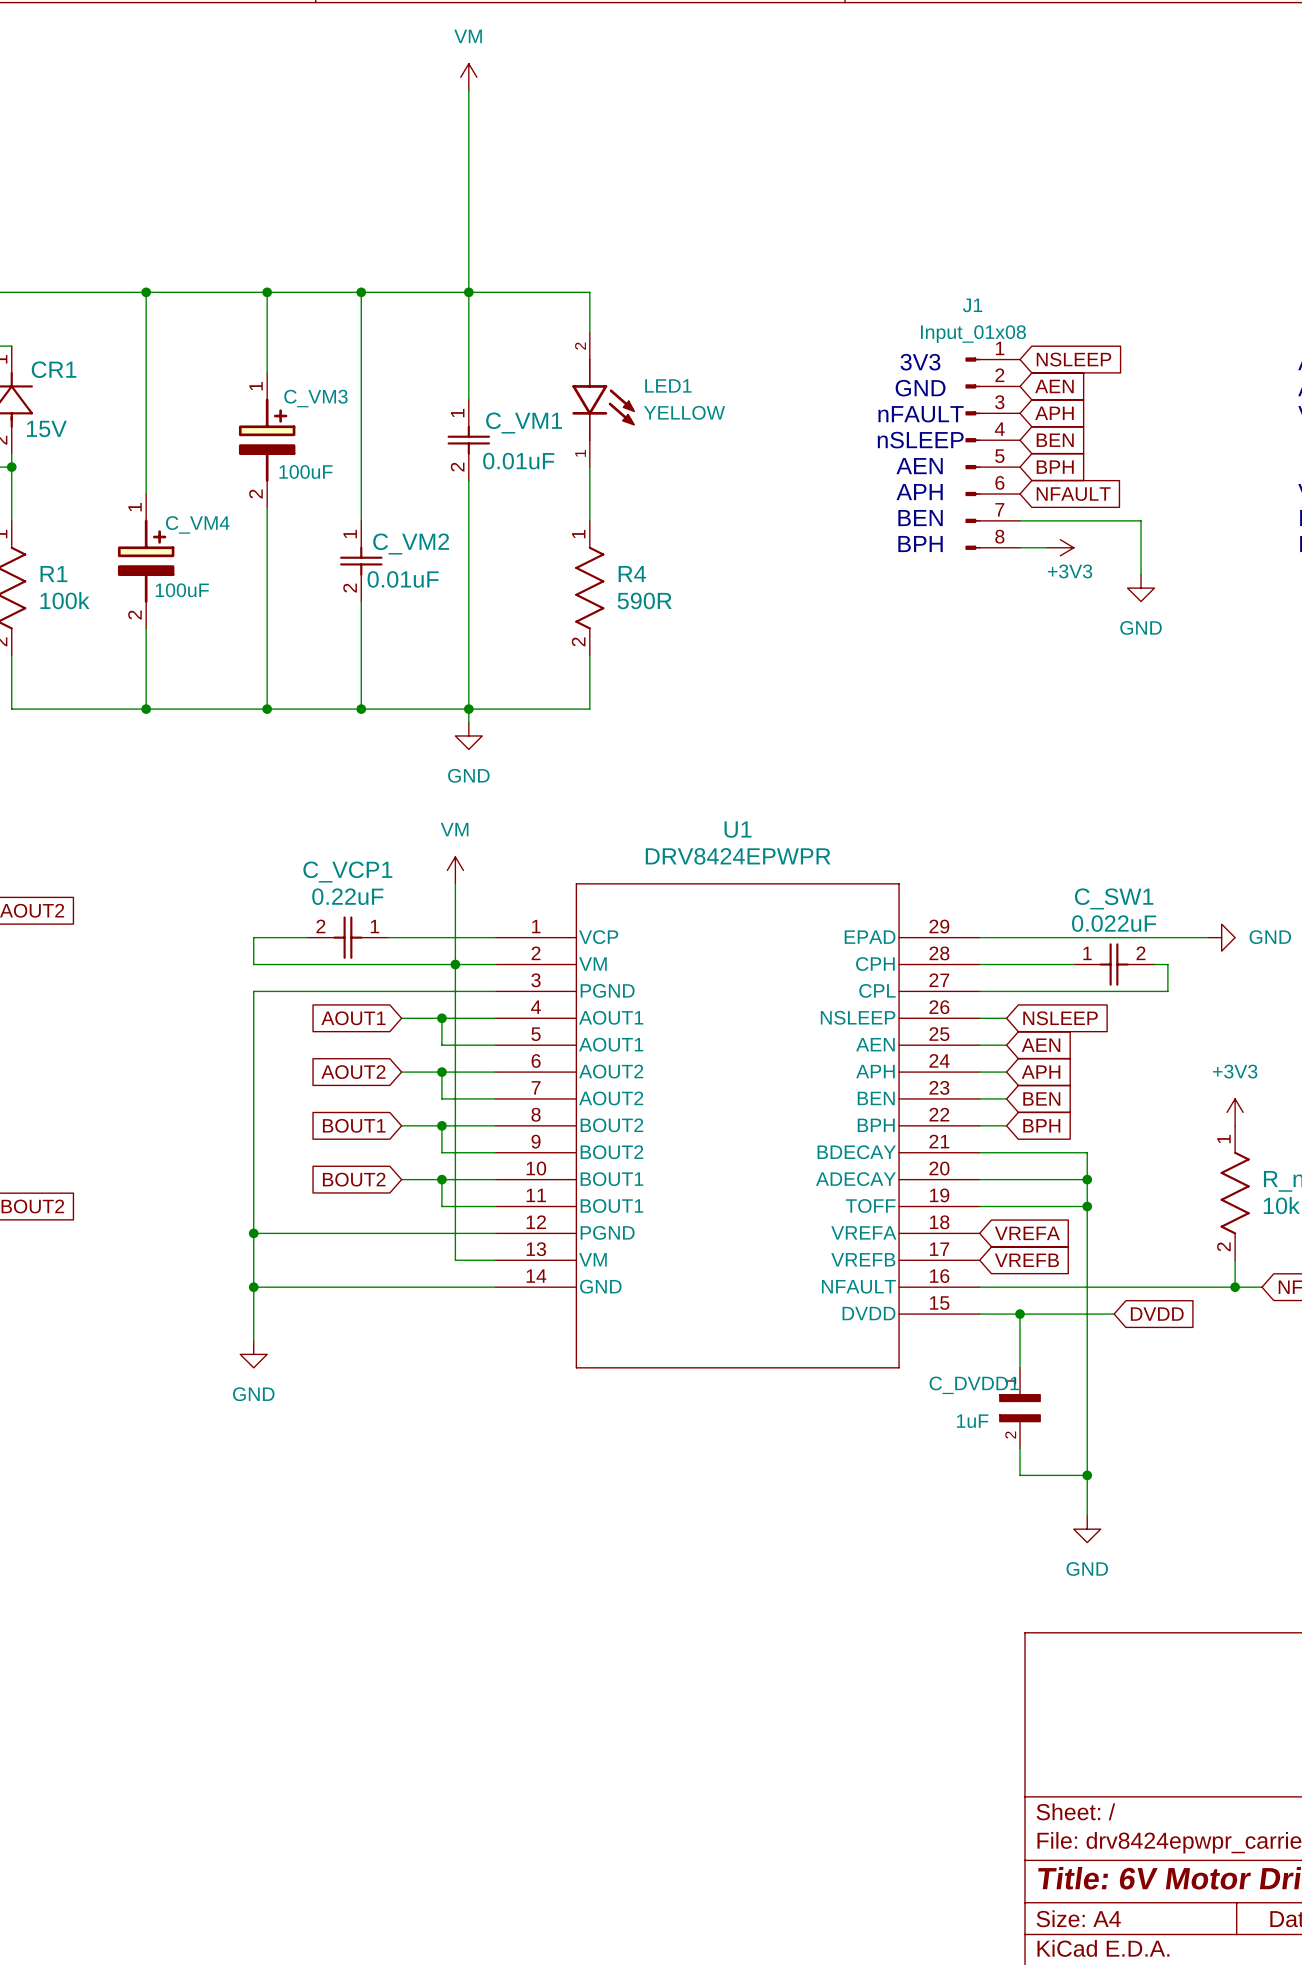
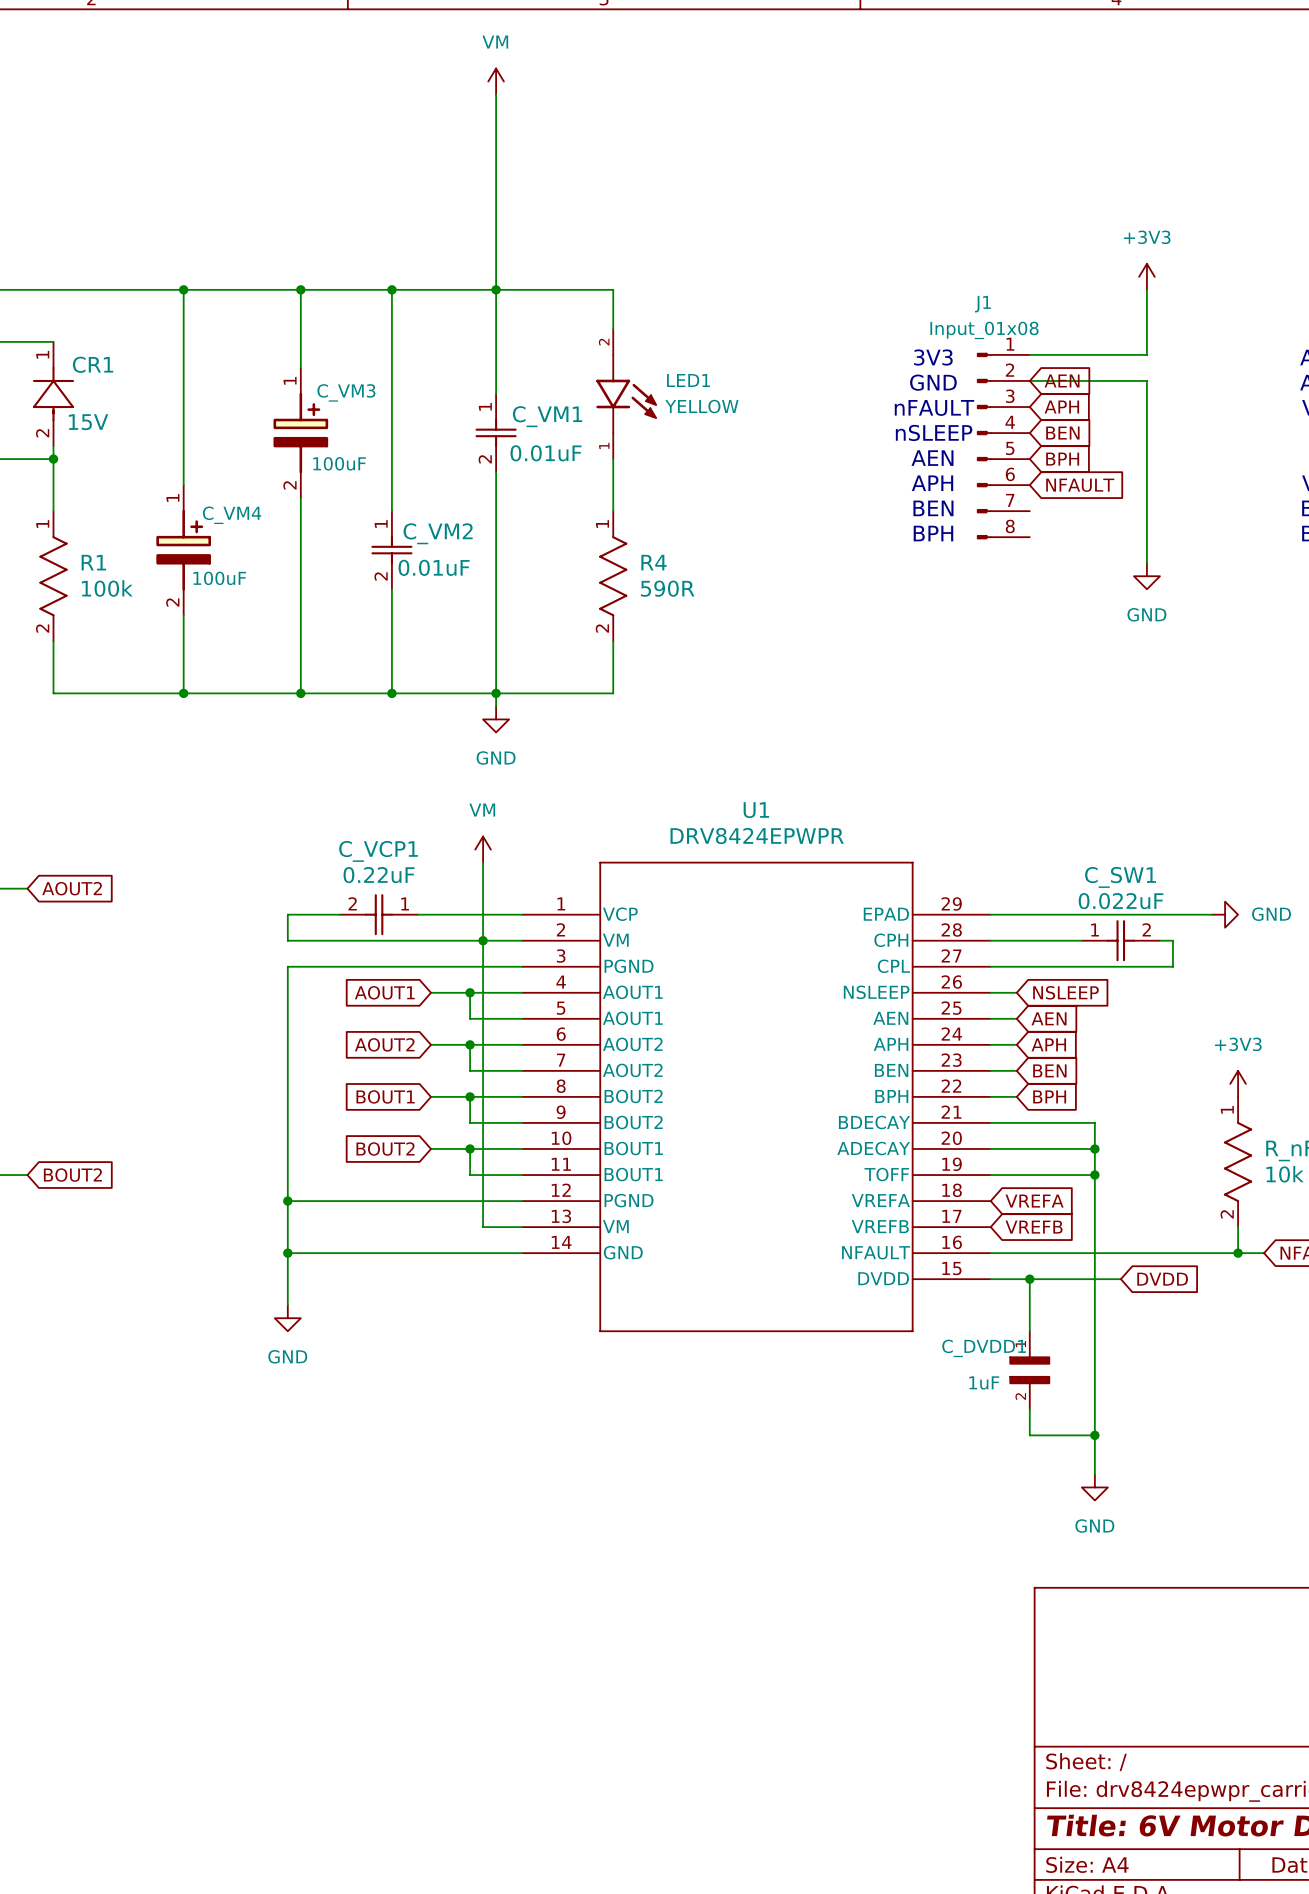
power symbol: none -> +3V3 (1146, 276)
wire: none -> (1146, 289) (1146, 354) (1029, 354)
global label: NSLEEP (1073, 359) -> none
wire: (1020, 520) (1141, 520) -> (1029, 380) (1146, 380) (1146, 511)
wire: (1020, 547) (1046, 547) -> none
power symbol: +3V3 (1060, 547) -> none

